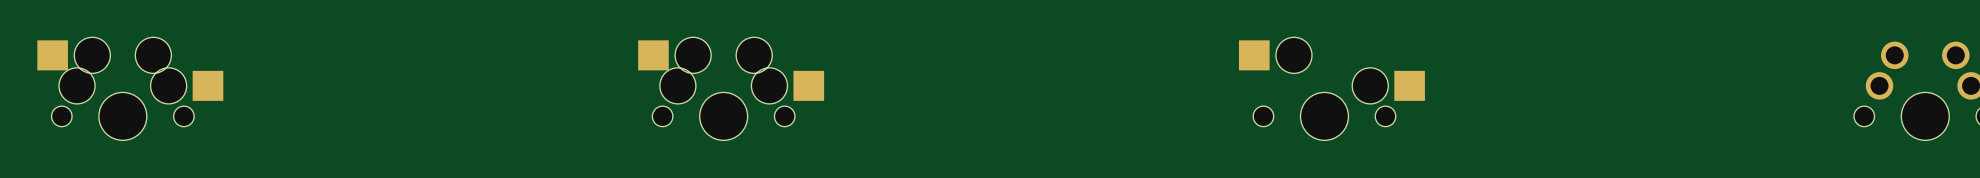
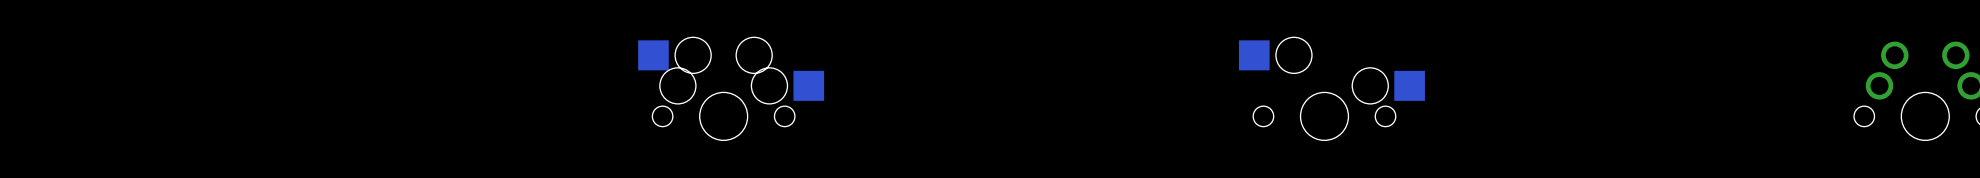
part: (130, 88) -> none

